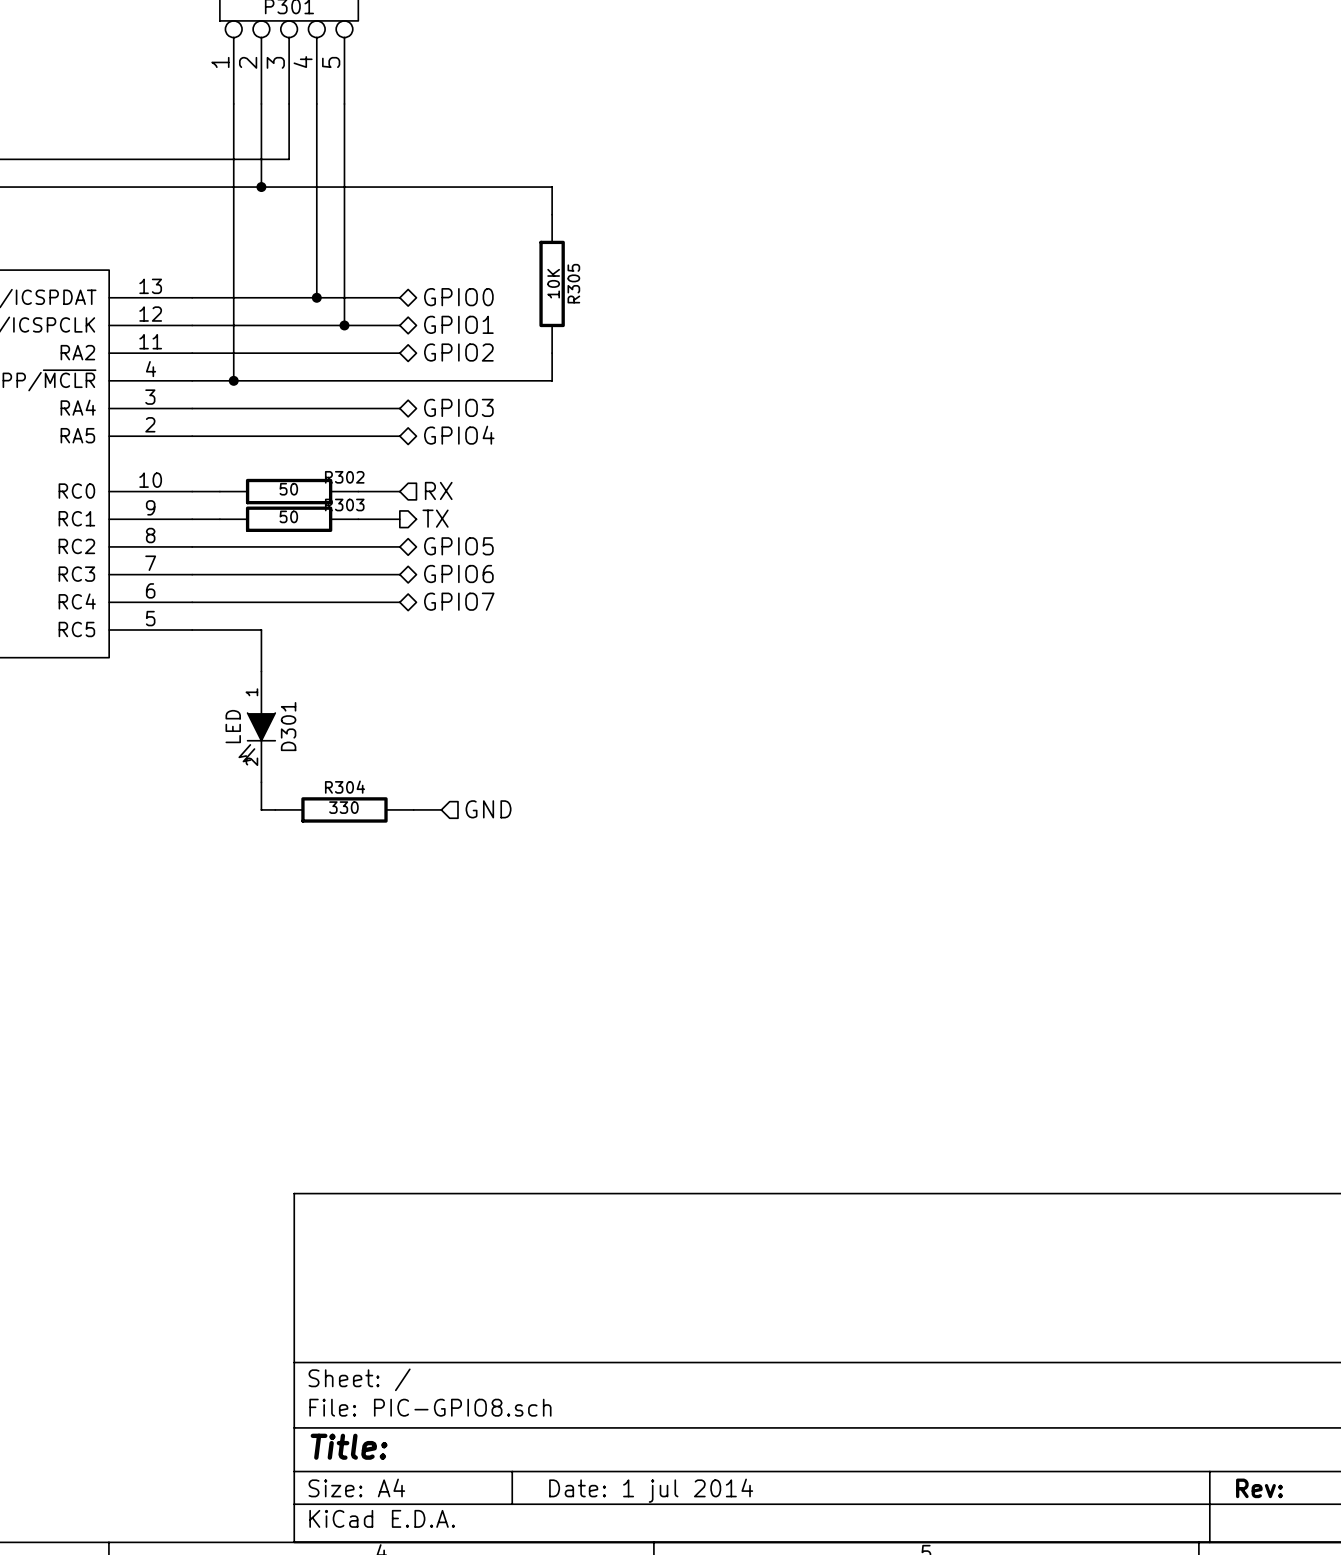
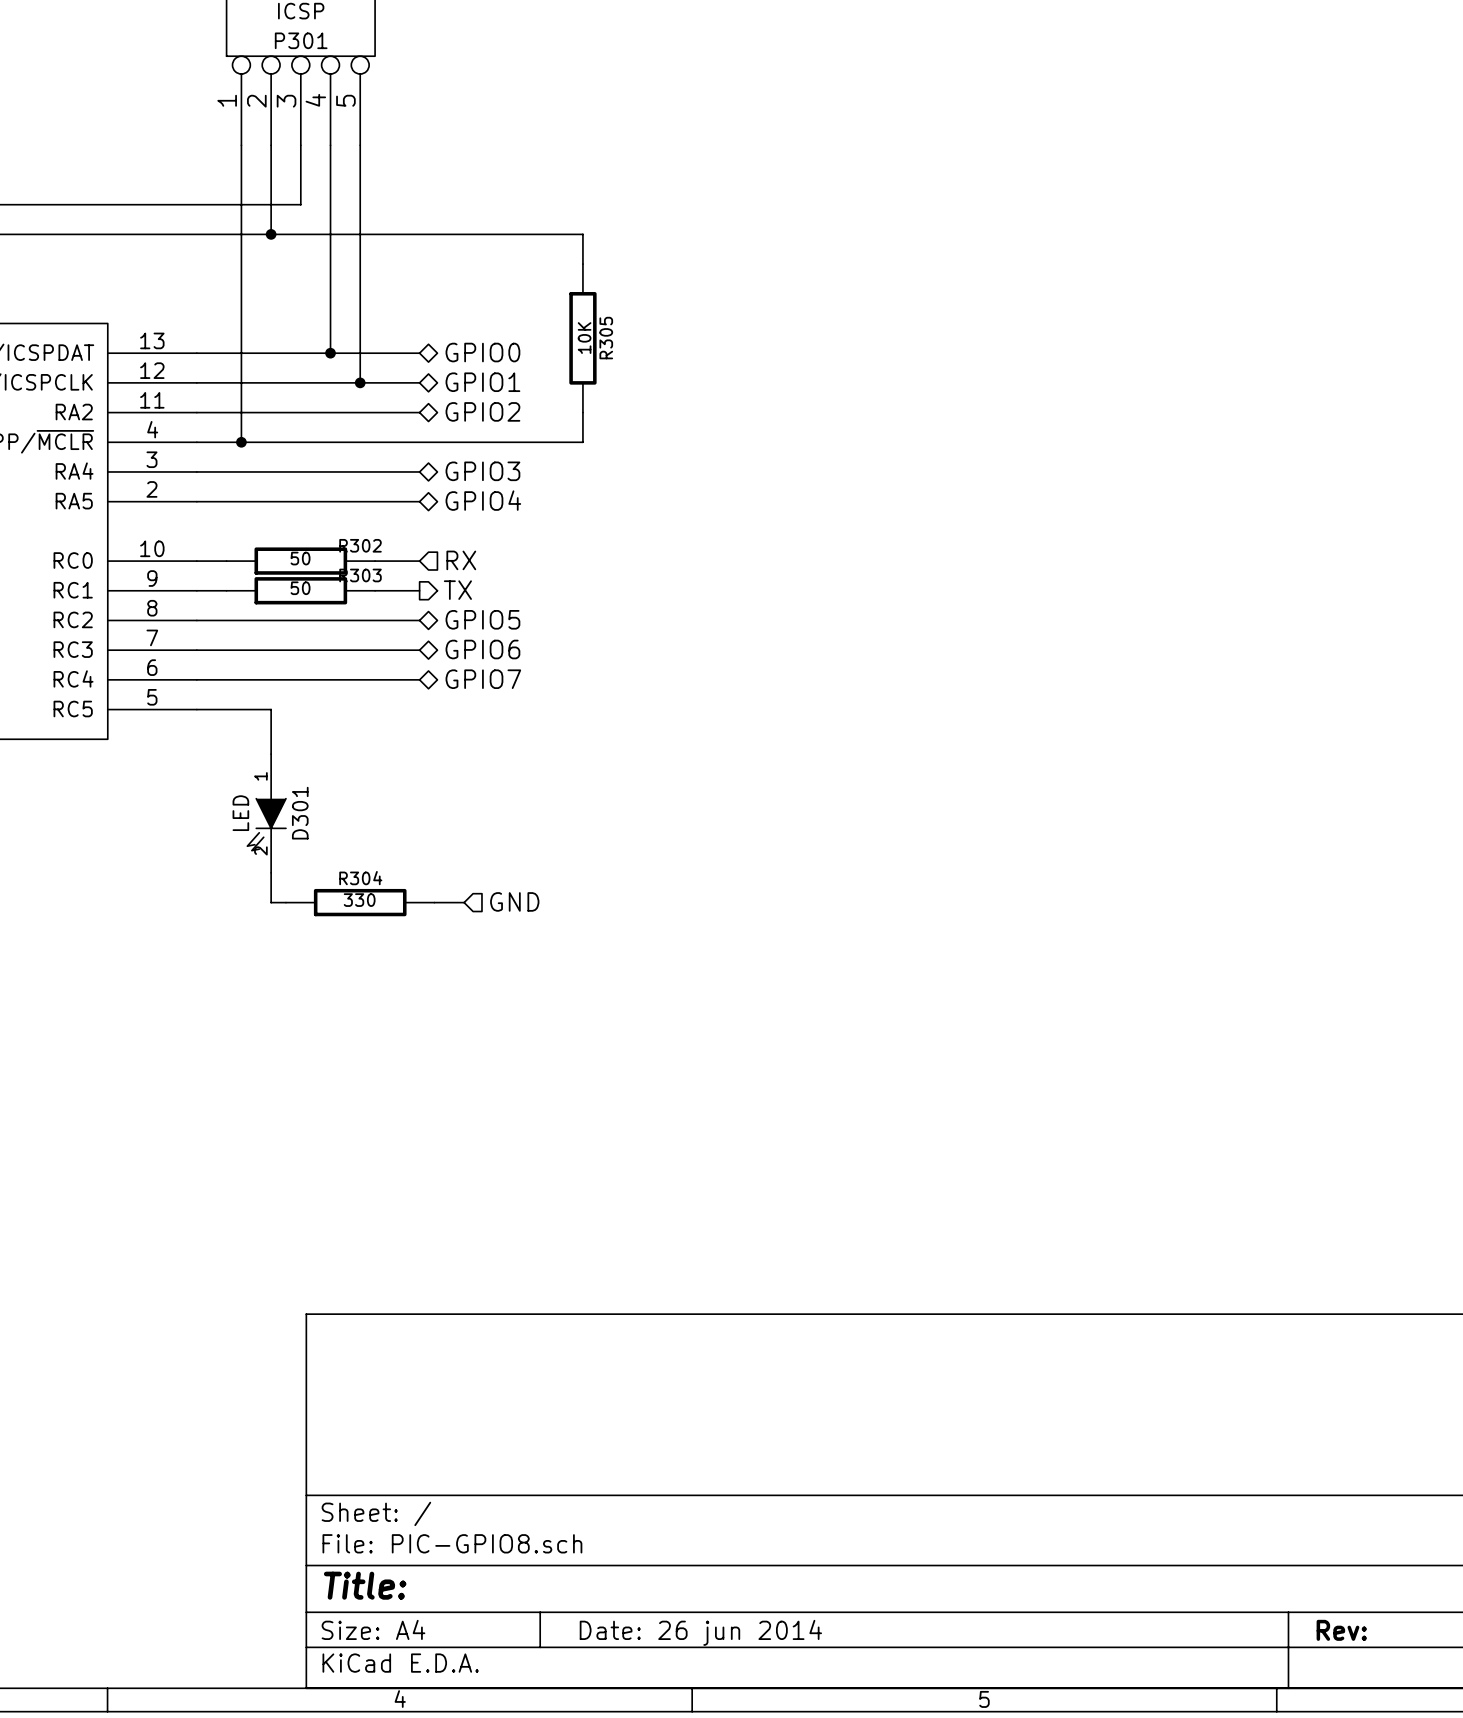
title block: Date: 1 jul 2014 (651, 1490) -> Date: 26 jun 2014 (700, 1632)

